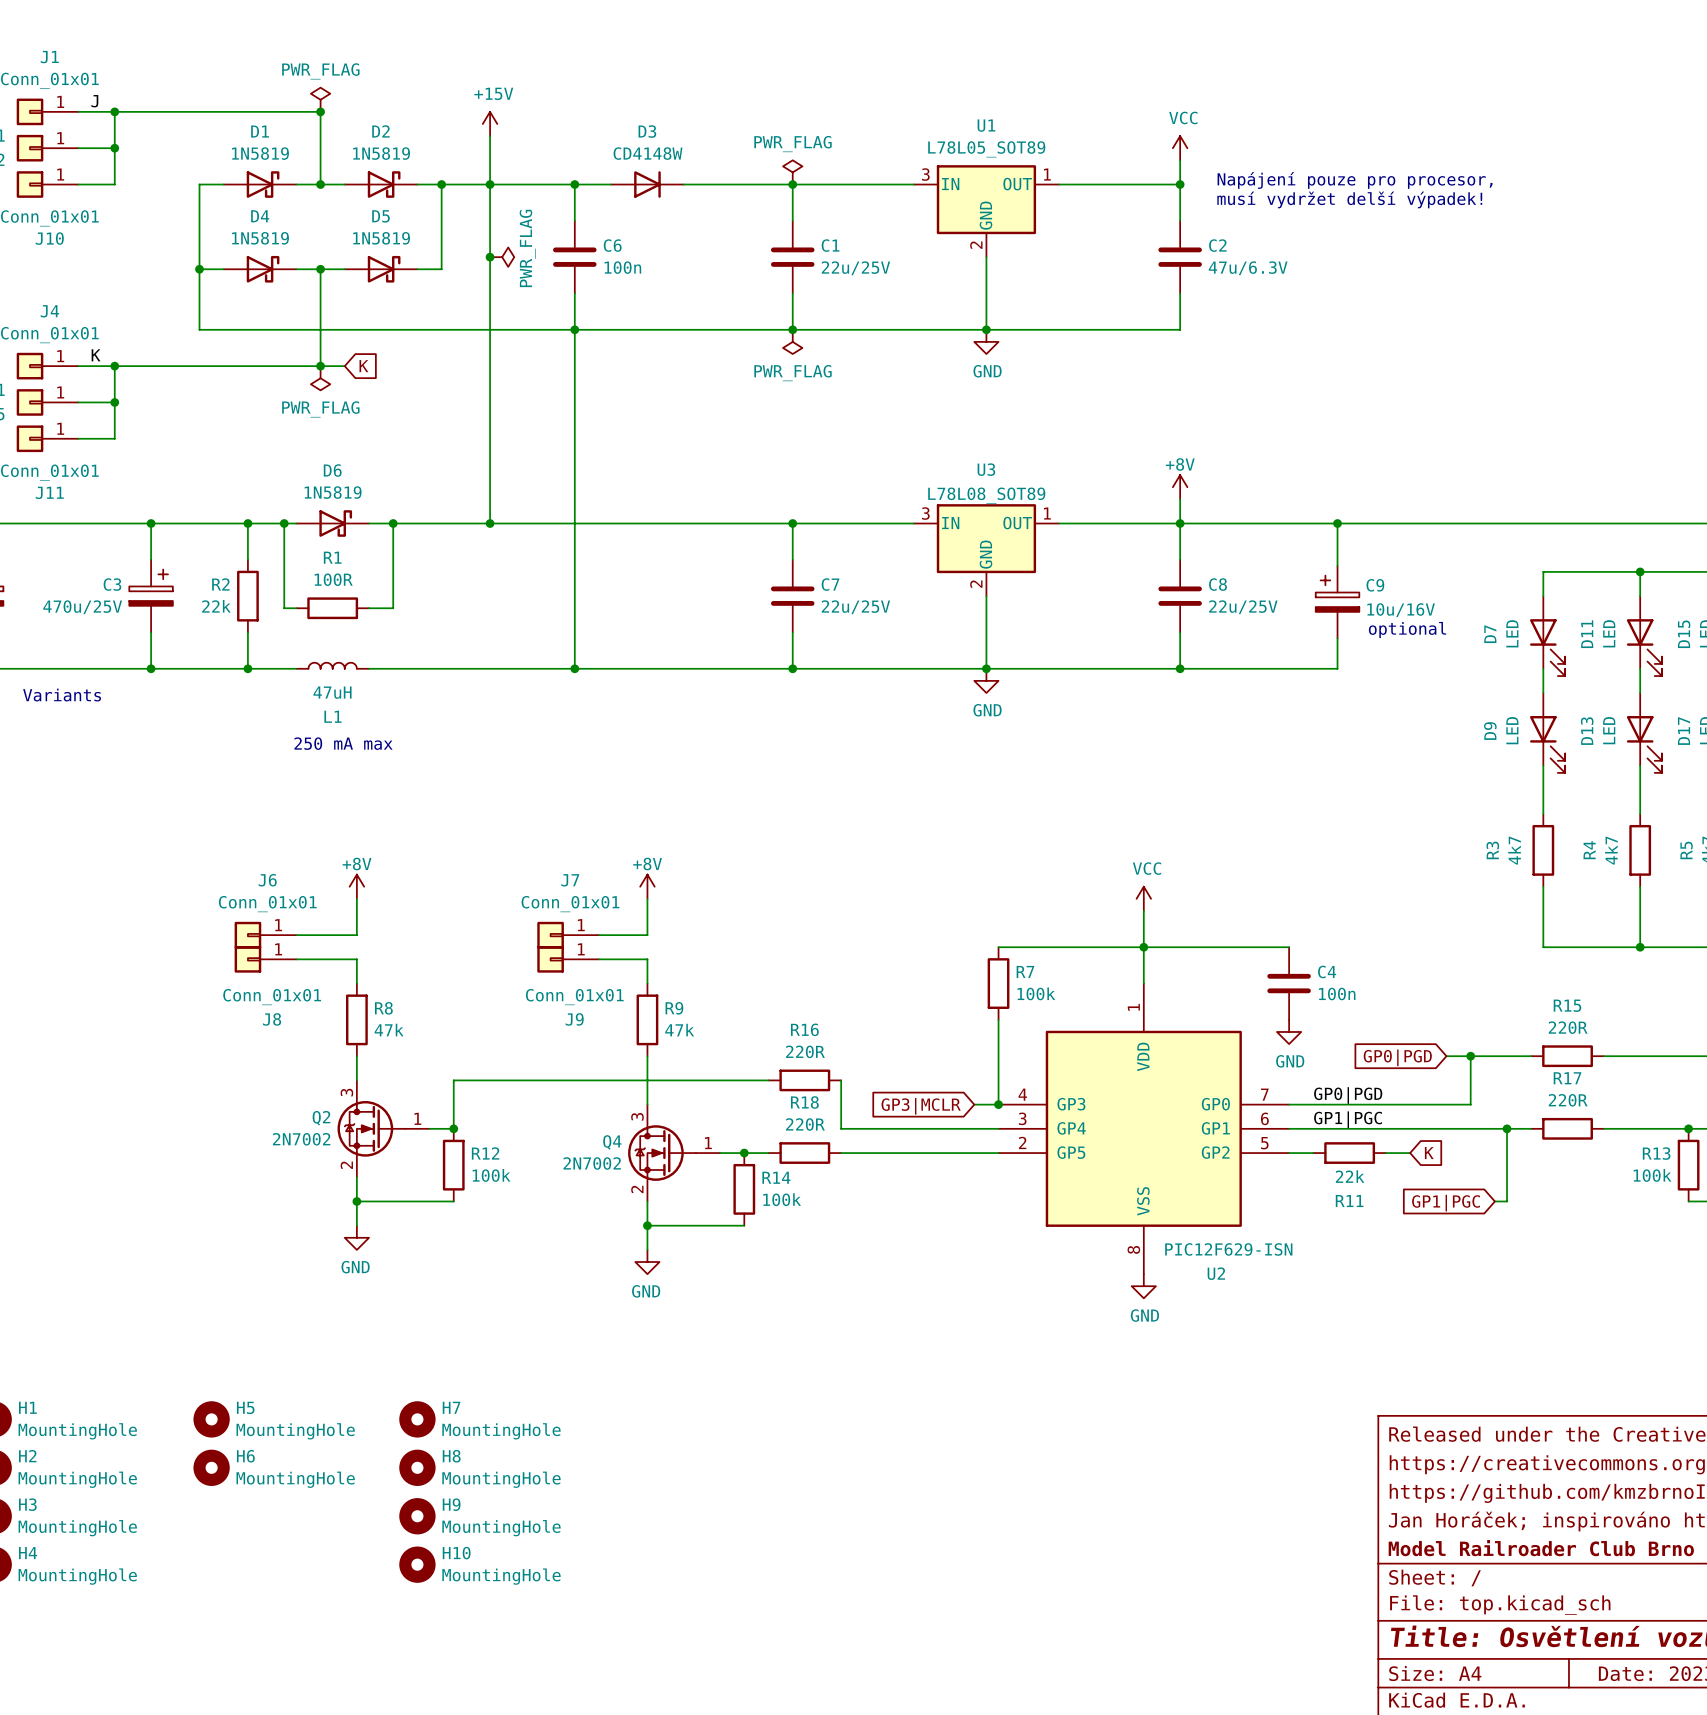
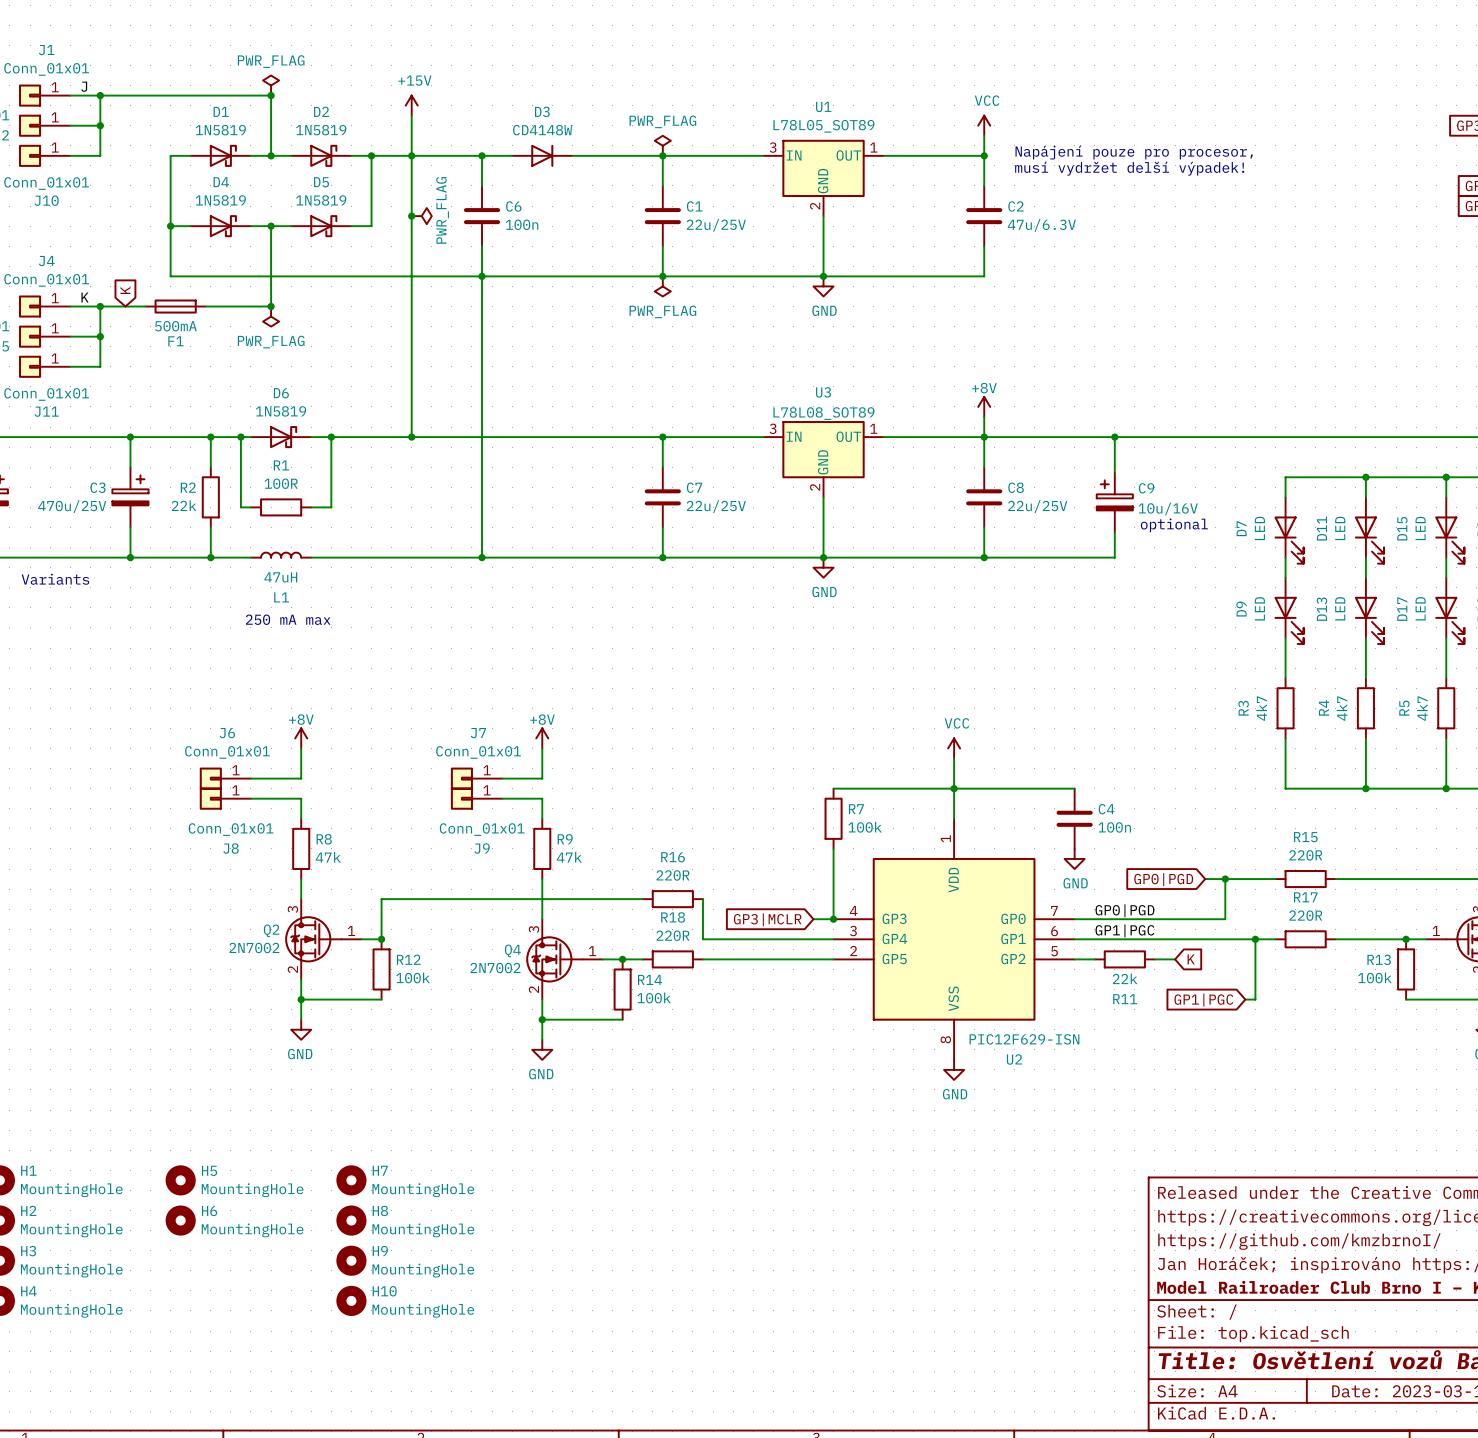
F1: none -> 500mA (175, 306)
wire: (320, 366) (344, 366) -> none
global label rotation: 0° (363, 366) -> 90° counterclockwise (125, 290)
global label position: K (363, 366) -> K (125, 290)

